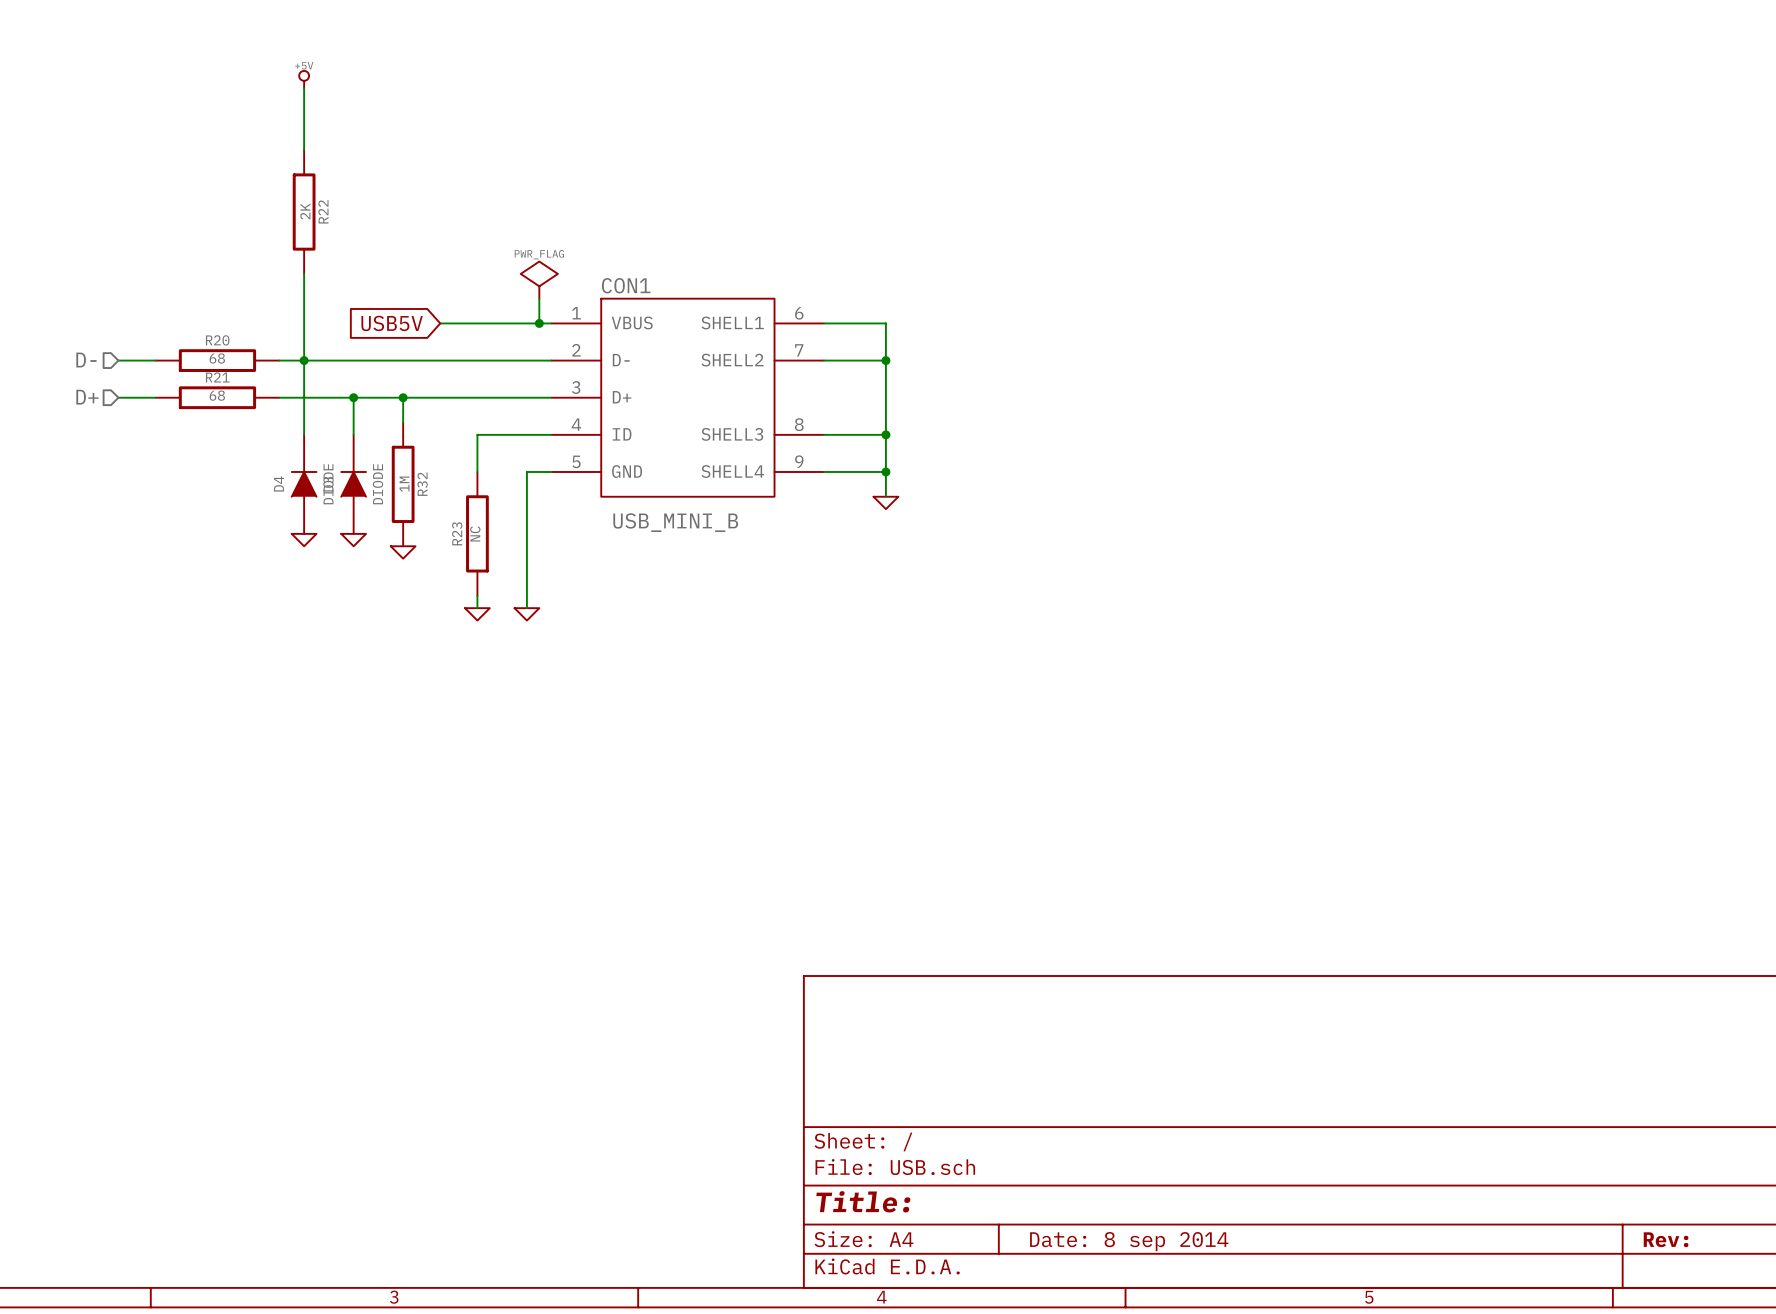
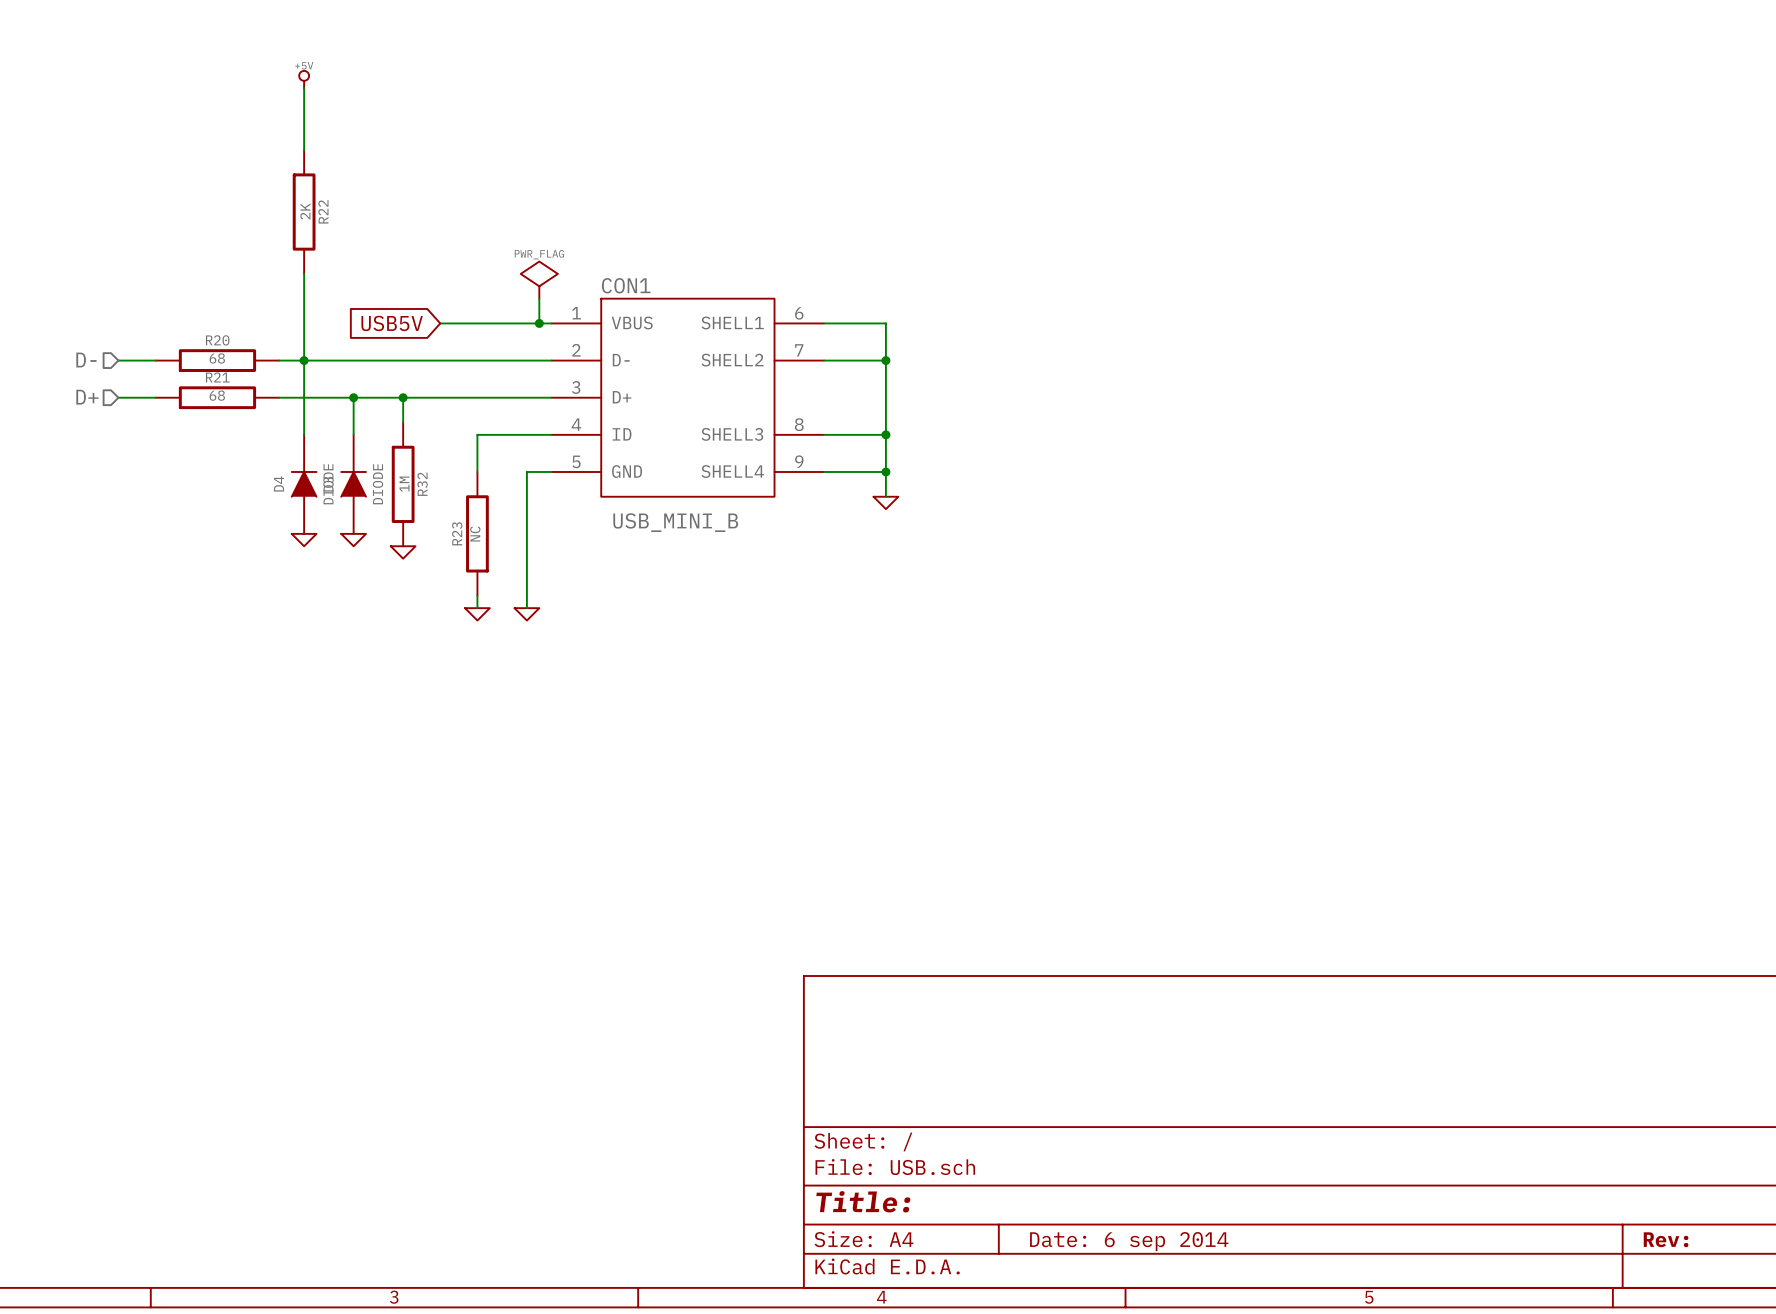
title block: Date: 8 sep 2014 (1129, 1241) -> Date: 6 sep 2014 (1129, 1241)

